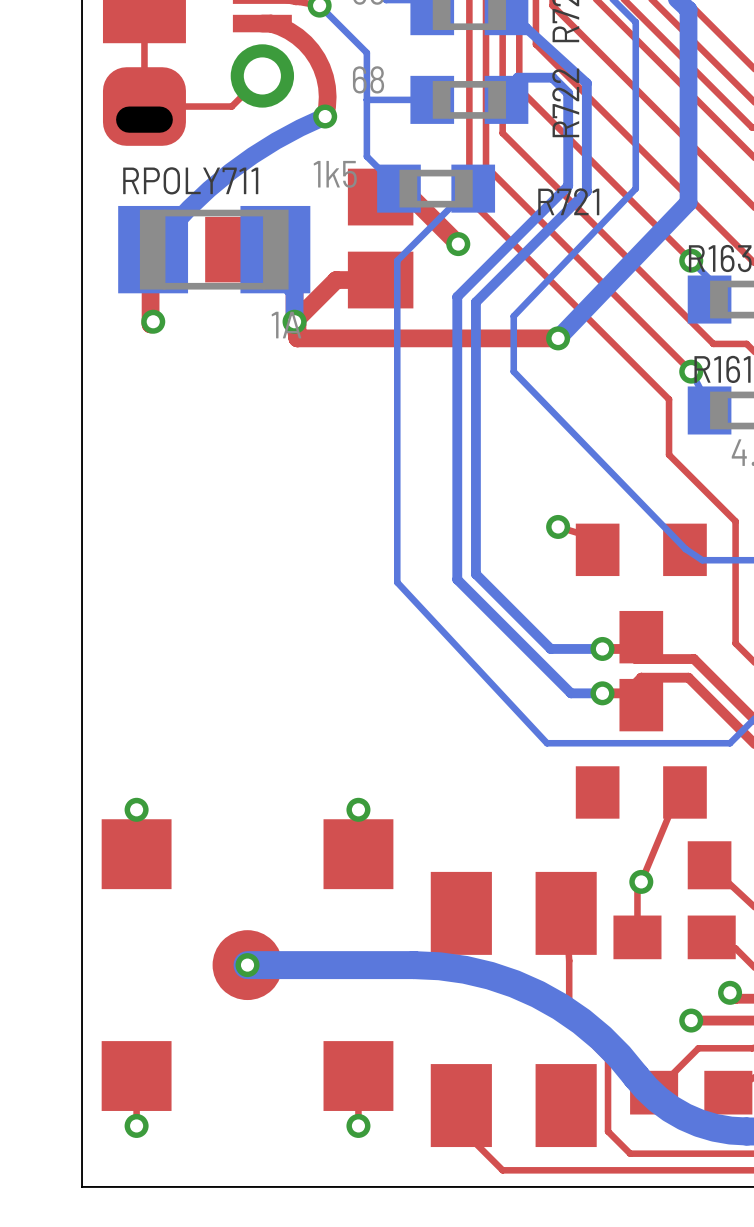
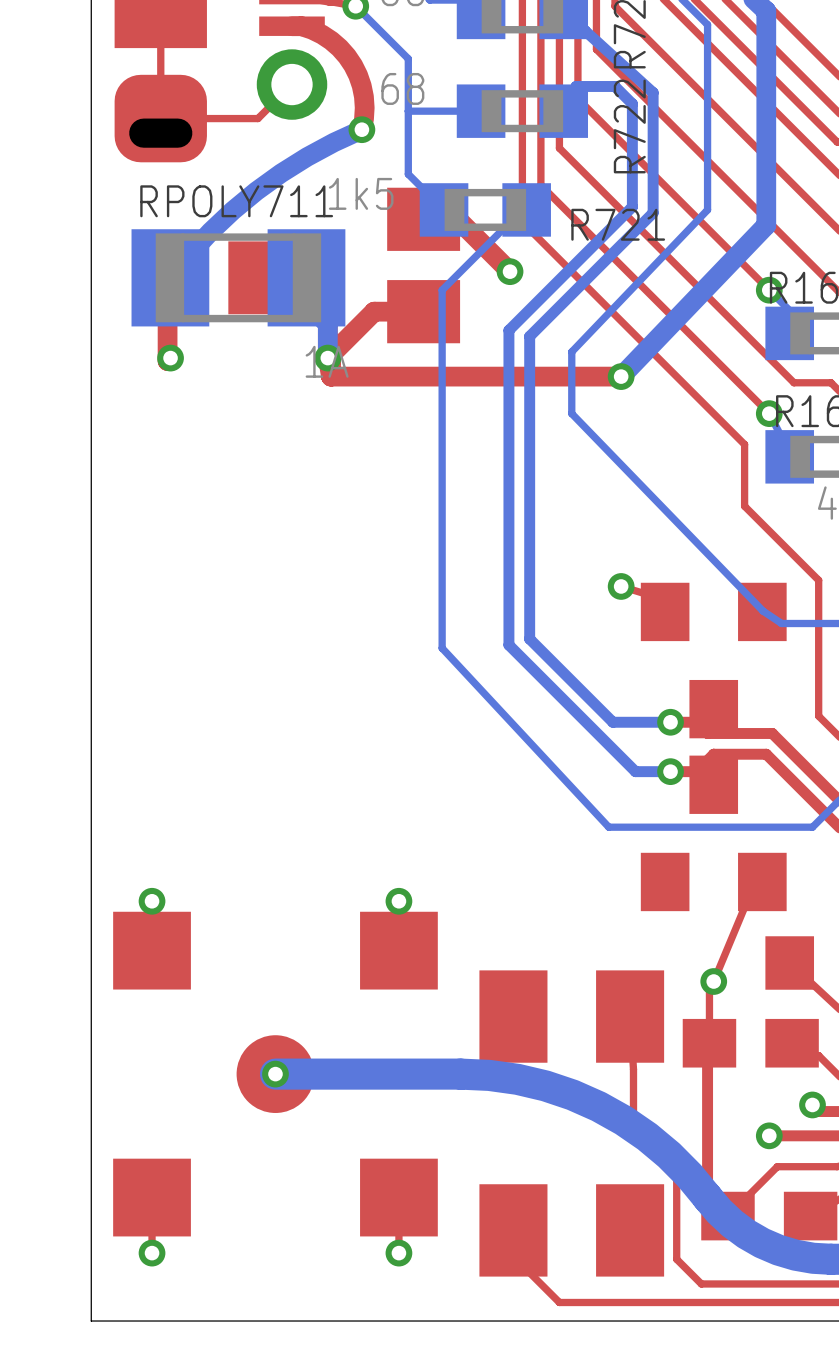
top track: none -> (709, 1043) (707, 1045) (707, 1197) (727, 1216)

